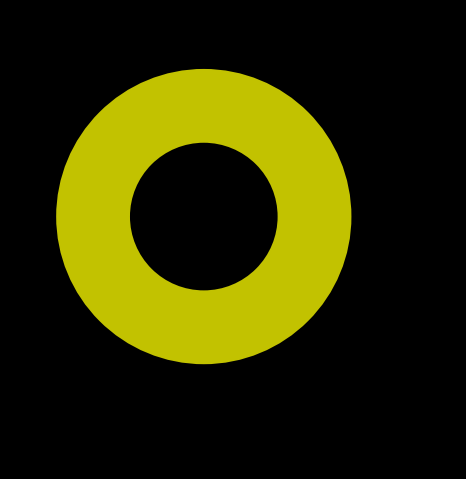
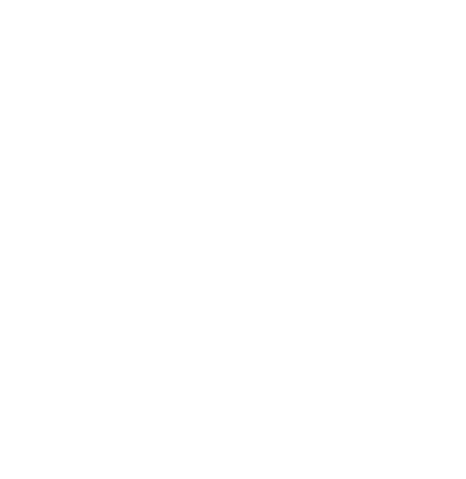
part: (203, 216) -> none

